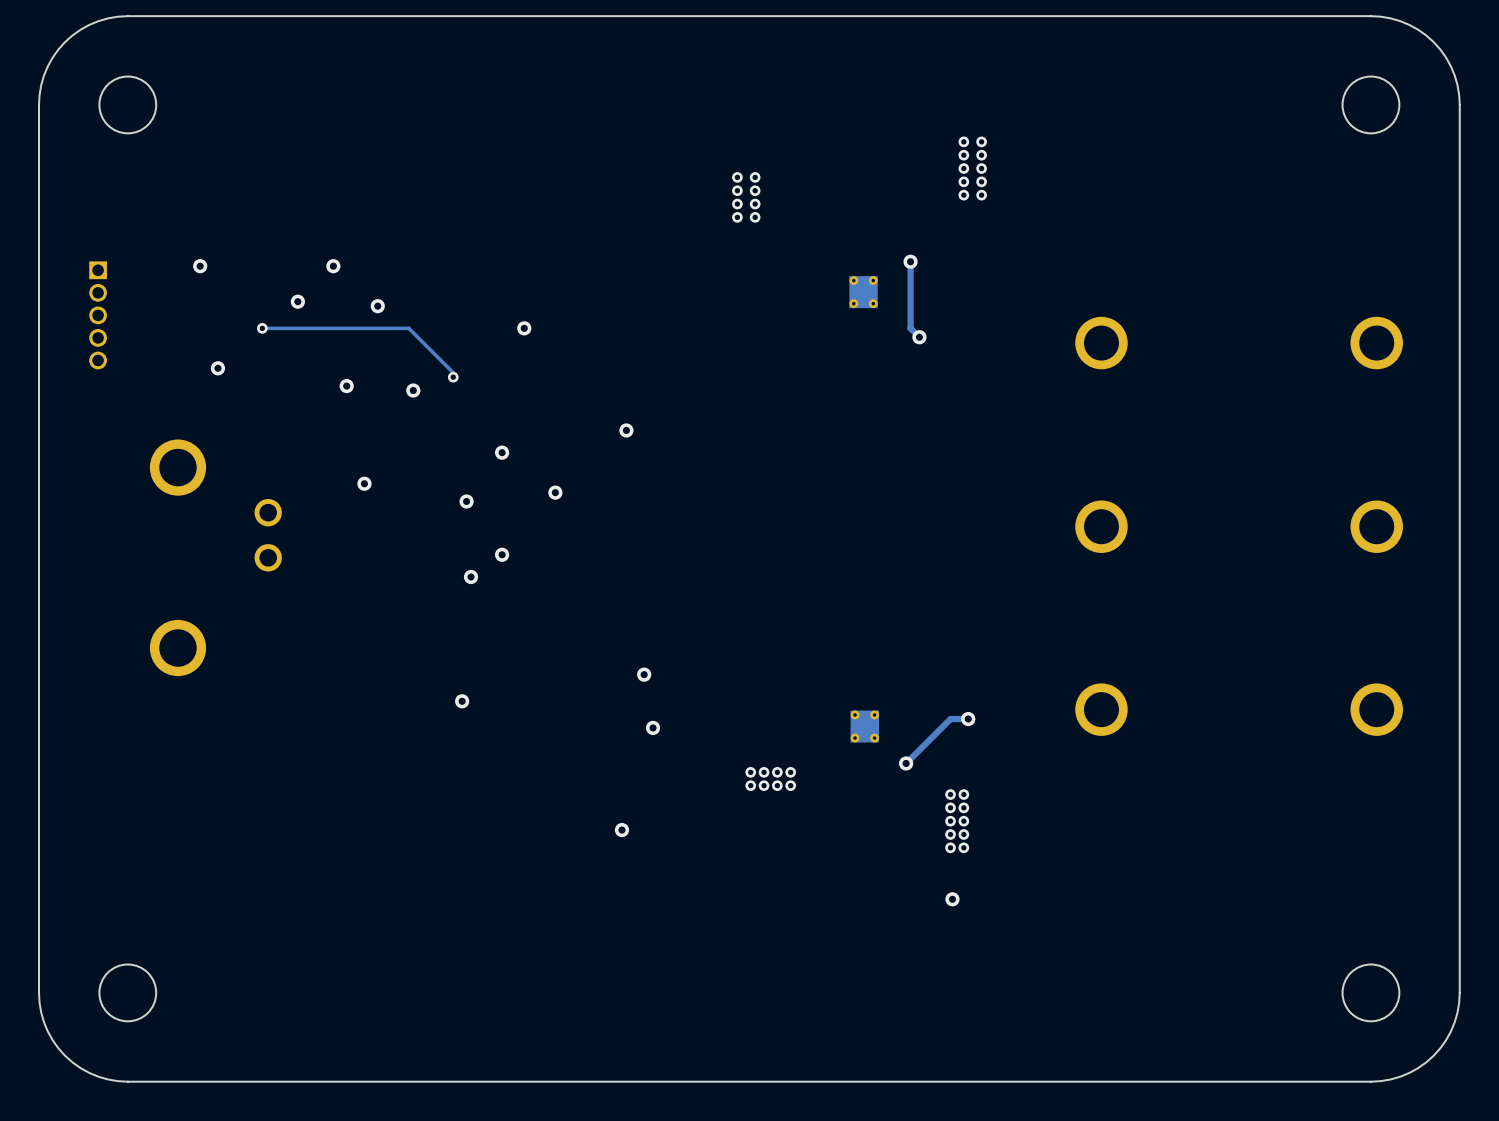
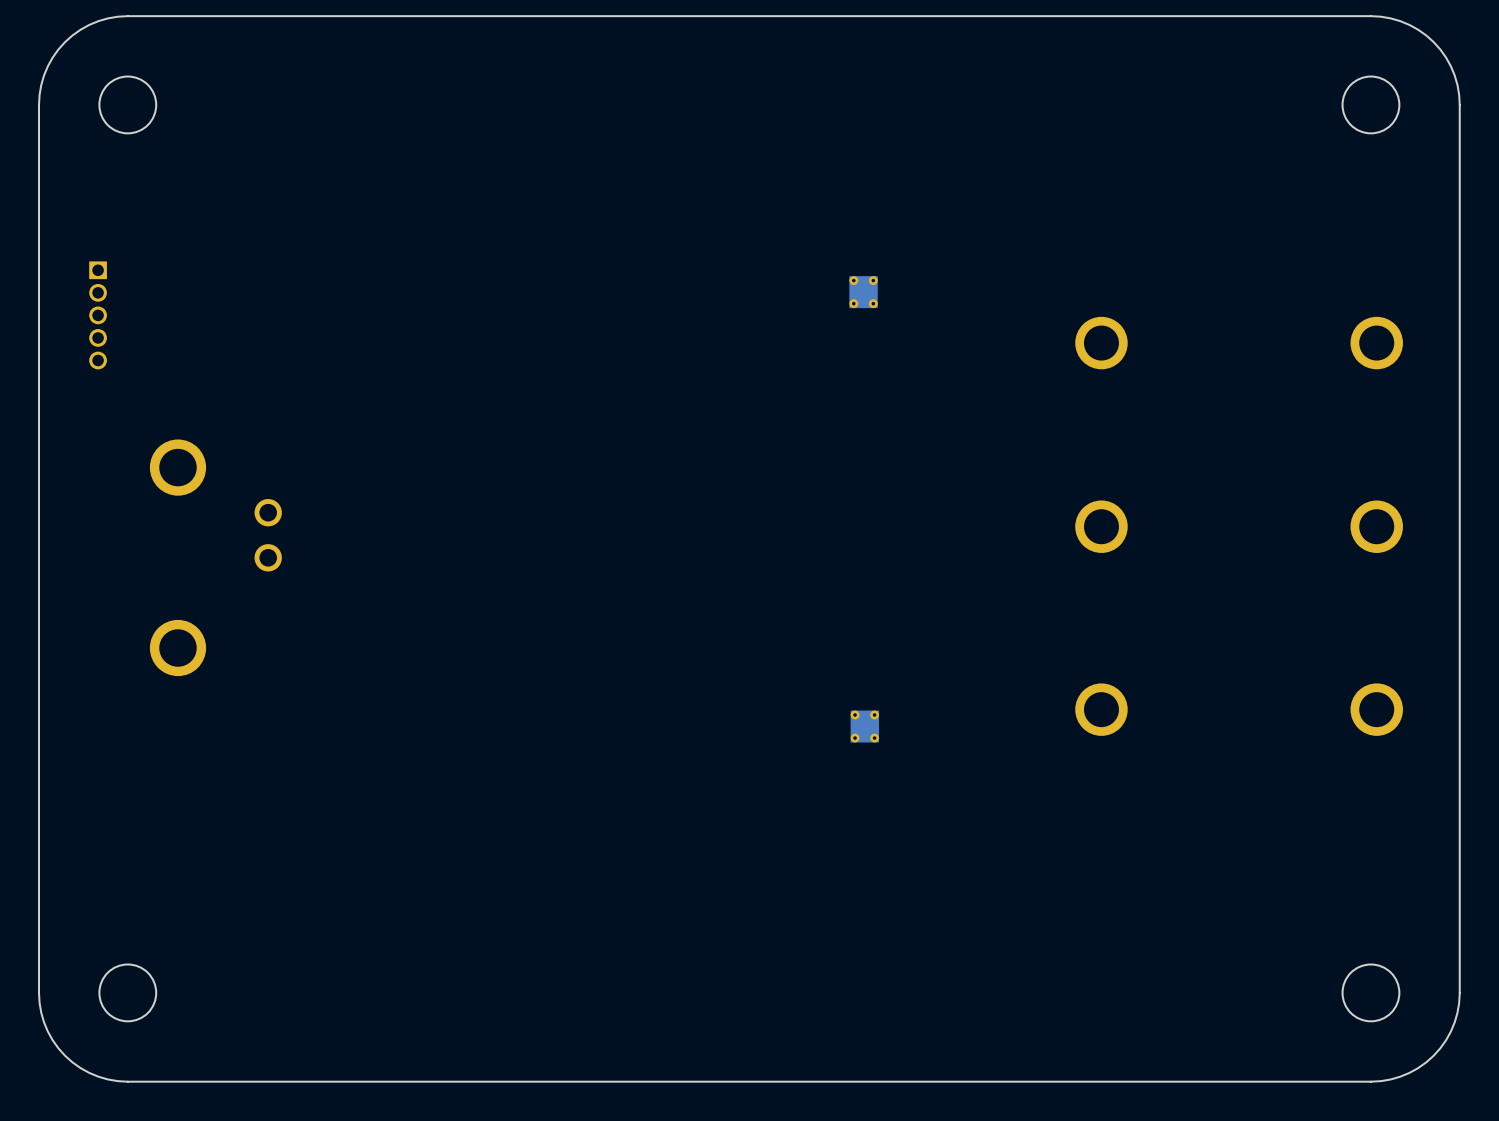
via: (963, 141) -> none
via: (981, 141) -> none
via: (963, 155) -> none
via: (981, 155) -> none
via: (963, 168) -> none
via: (981, 168) -> none
via: (737, 177) -> none
via: (755, 177) -> none
via: (963, 181) -> none
via: (981, 181) -> none
via: (737, 190) -> none
via: (755, 190) -> none
via: (963, 195) -> none
via: (981, 195) -> none
via: (737, 204) -> none
via: (755, 204) -> none
via: (737, 217) -> none
via: (755, 217) -> none
track: (910, 261) (910, 328) (919, 337) -> none
via: (910, 261) -> none
via: (200, 266) -> none
via: (333, 266) -> none
via: (297, 301) -> none
via: (377, 306) -> none
track: (262, 328) (408, 328) (453, 372) (453, 377) -> none
via: (262, 328) -> none
via: (524, 328) -> none
via: (919, 337) -> none
via: (217, 368) -> none
via: (453, 377) -> none
via: (346, 386) -> none
via: (413, 390) -> none
via: (626, 430) -> none
via: (502, 452) -> none
via: (364, 483) -> none
via: (555, 492) -> none
via: (466, 501) -> none
via: (502, 554) -> none
via: (471, 576) -> none
via: (644, 674) -> none
via: (462, 701) -> none
track: (968, 719) (950, 719) (906, 763) -> none
via: (968, 719) -> none
via: (653, 727) -> none
via: (906, 763) -> none
via: (750, 772) -> none
via: (764, 772) -> none
via: (777, 772) -> none
via: (790, 772) -> none
via: (750, 785) -> none
via: (764, 785) -> none
via: (777, 785) -> none
via: (790, 785) -> none
via: (950, 794) -> none
via: (963, 794) -> none
via: (950, 807) -> none
via: (963, 807) -> none
via: (950, 821) -> none
via: (963, 821) -> none
via: (621, 830) -> none
via: (950, 834) -> none
via: (963, 834) -> none
via: (950, 847) -> none
via: (963, 847) -> none
via: (952, 899) -> none

